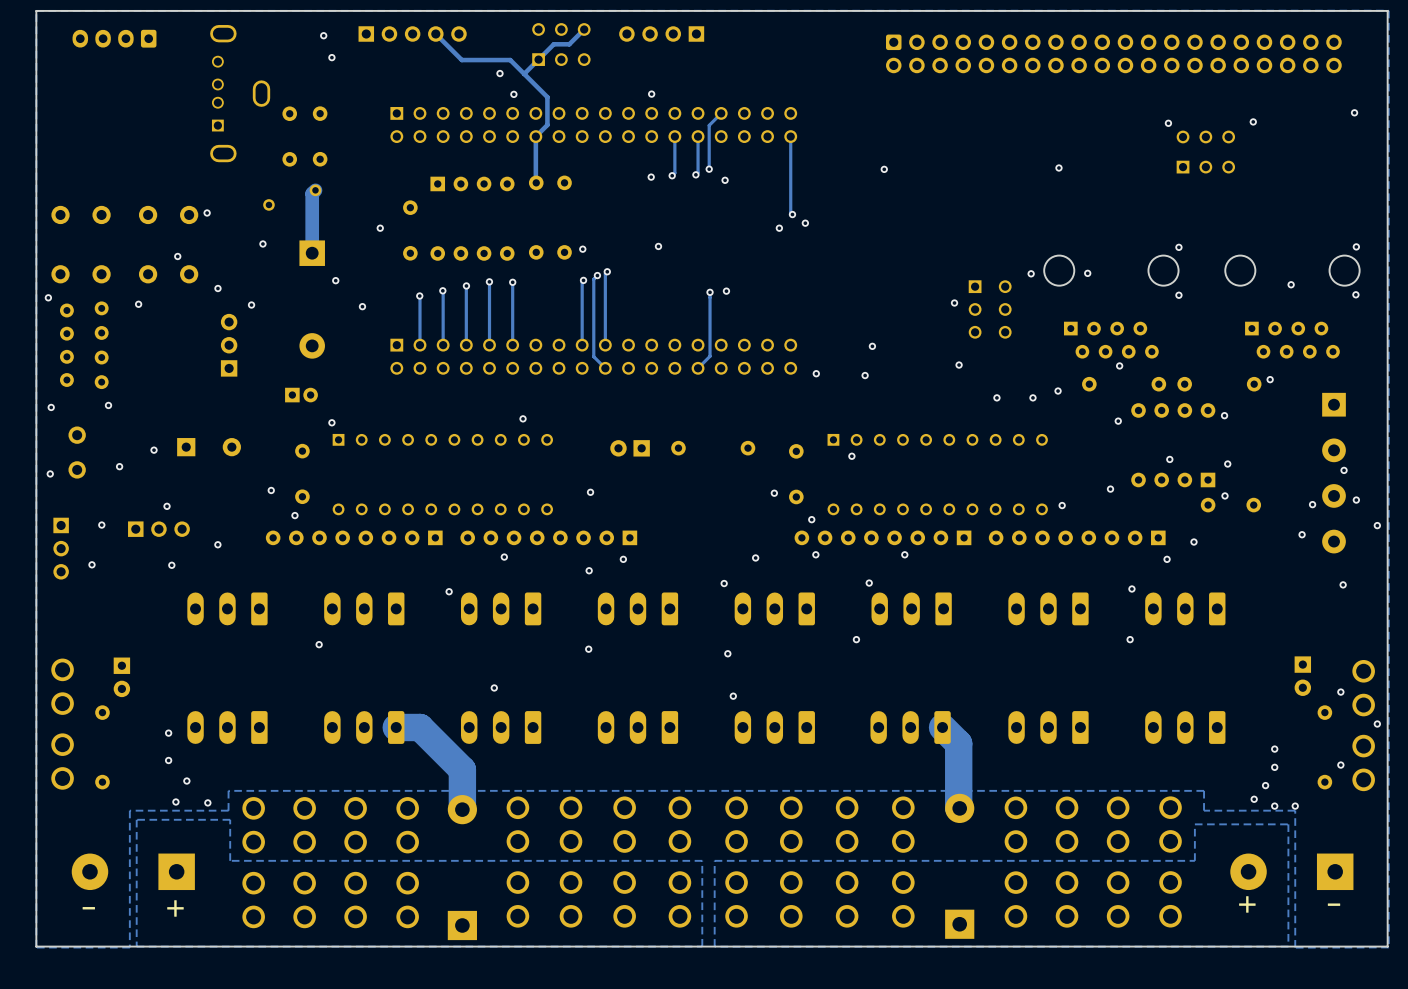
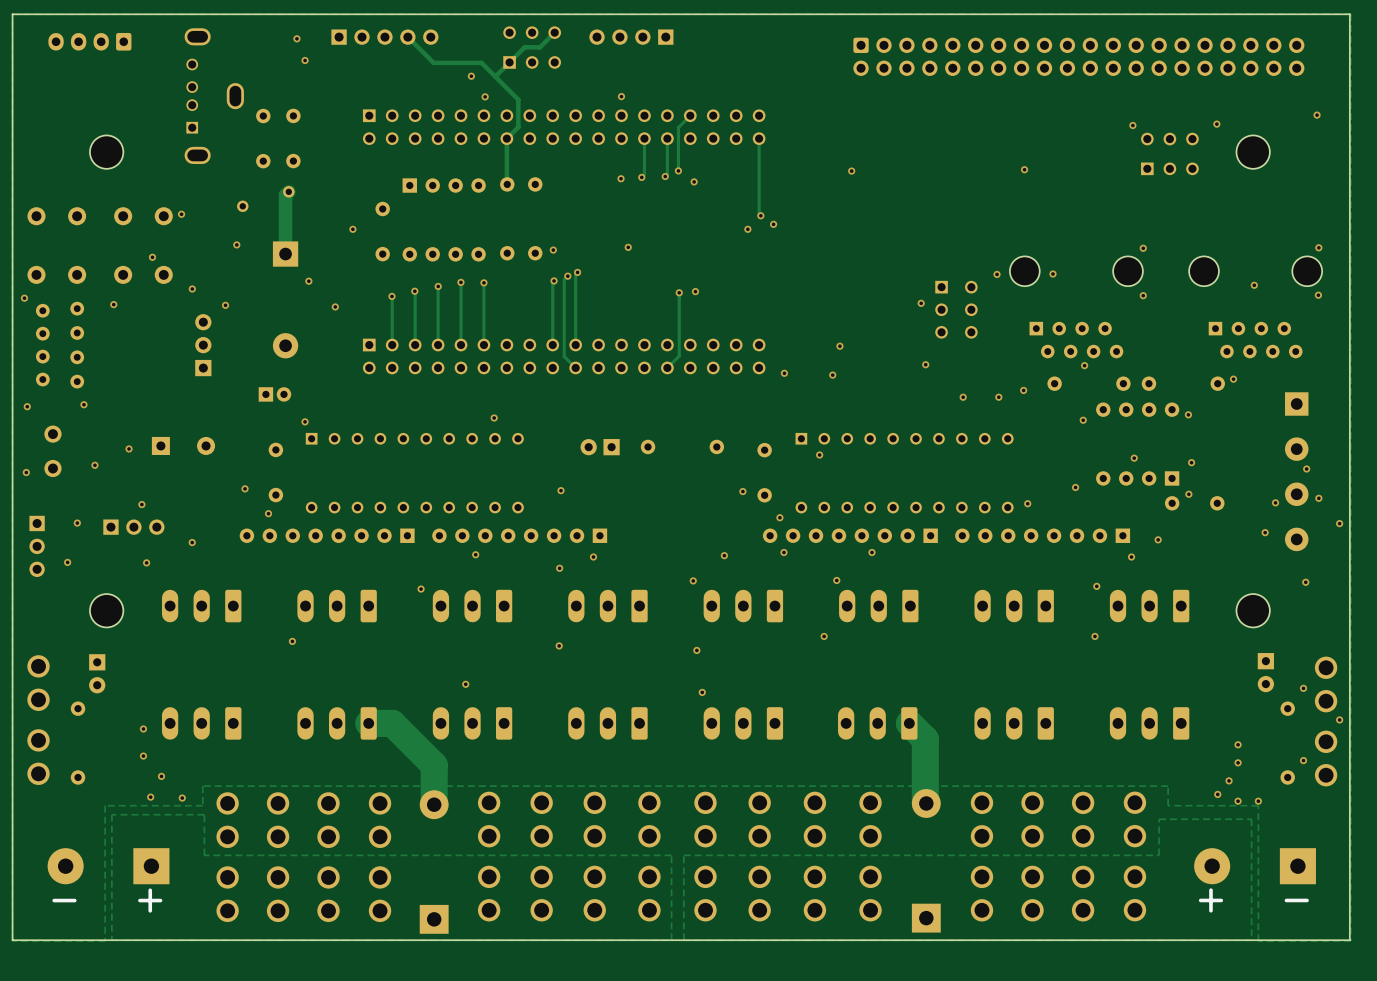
part: none -> (106, 152)
part: none -> (1253, 152)
part: none -> (106, 610)
part: none -> (1253, 610)

